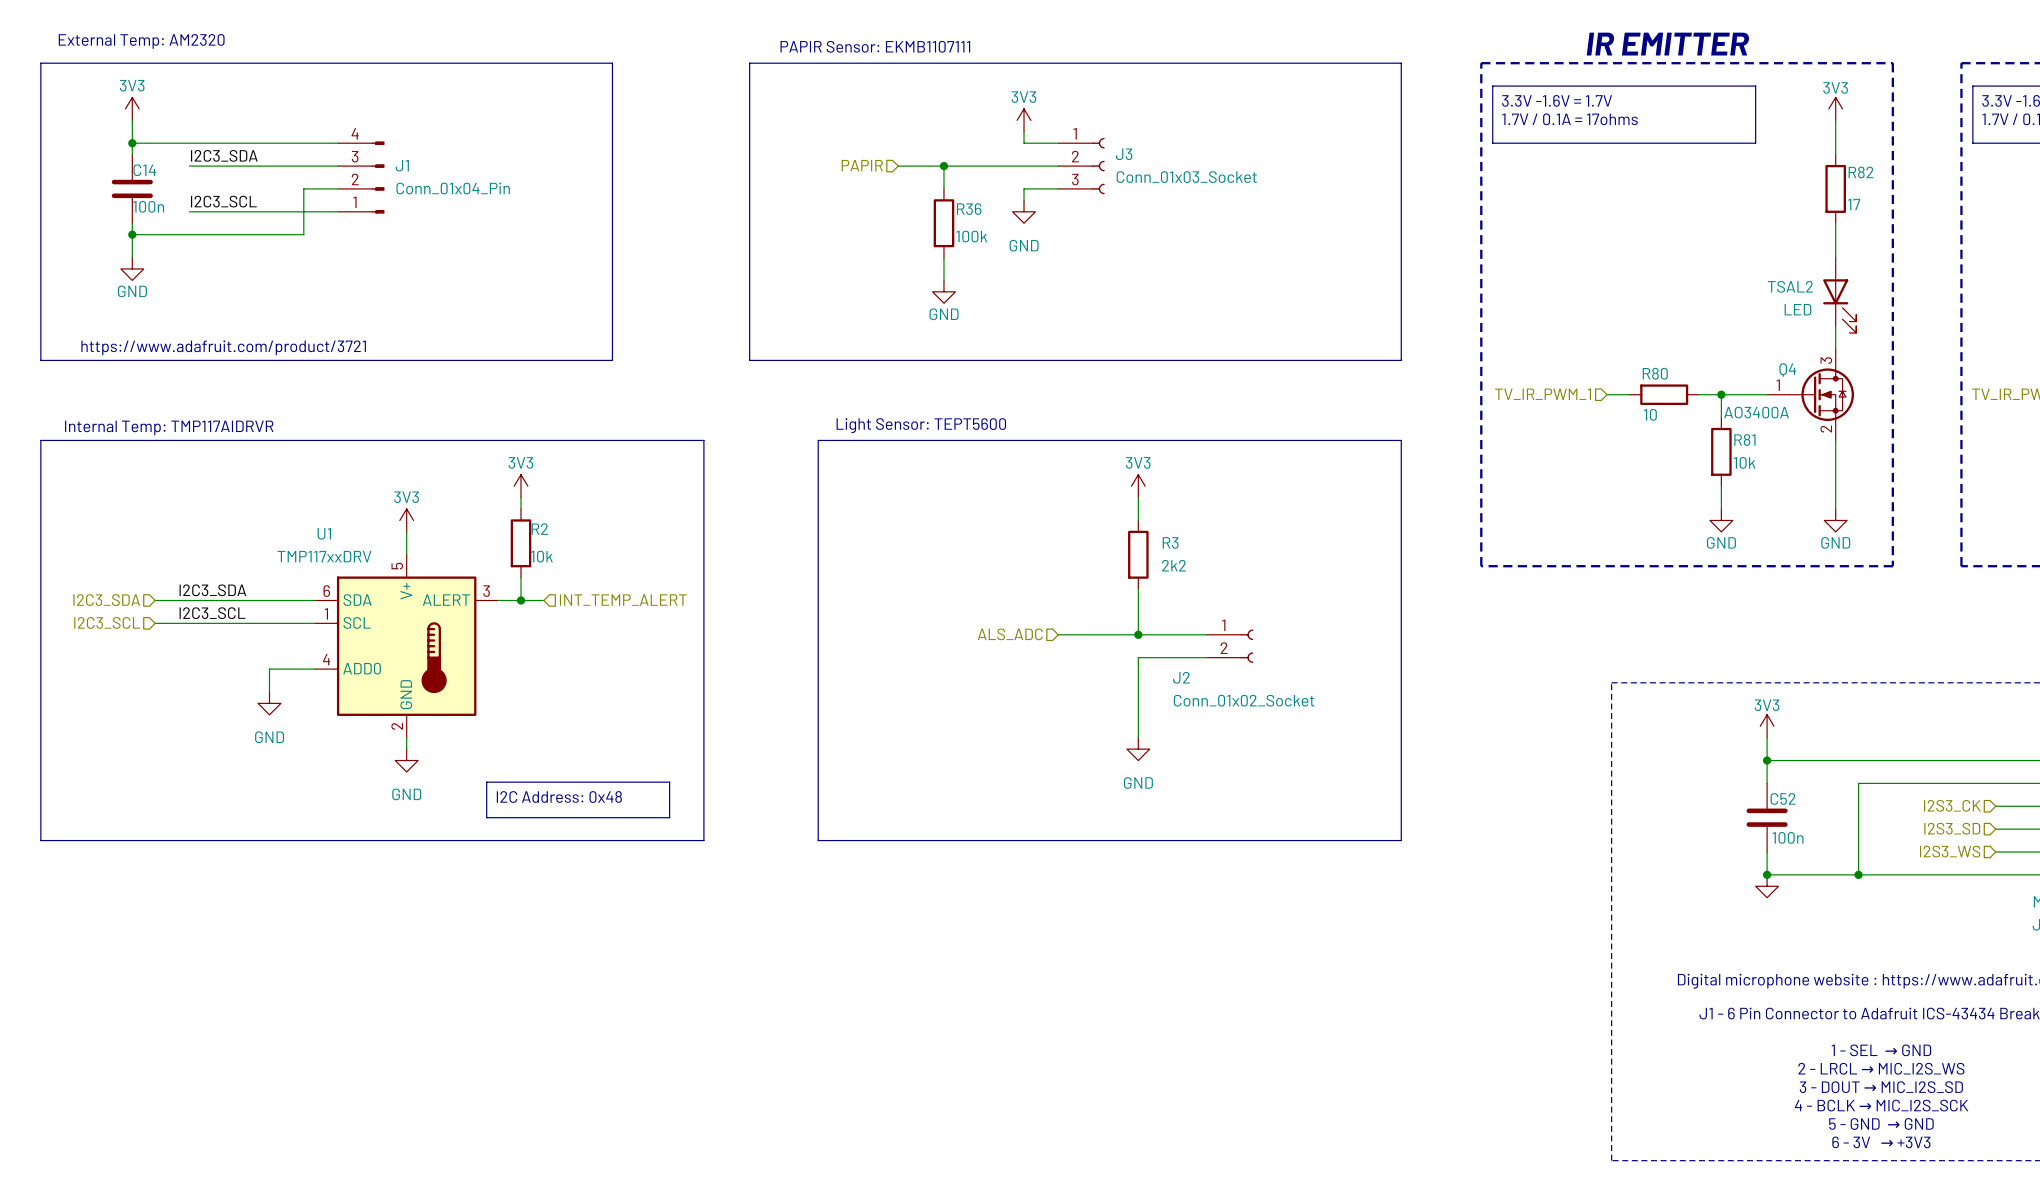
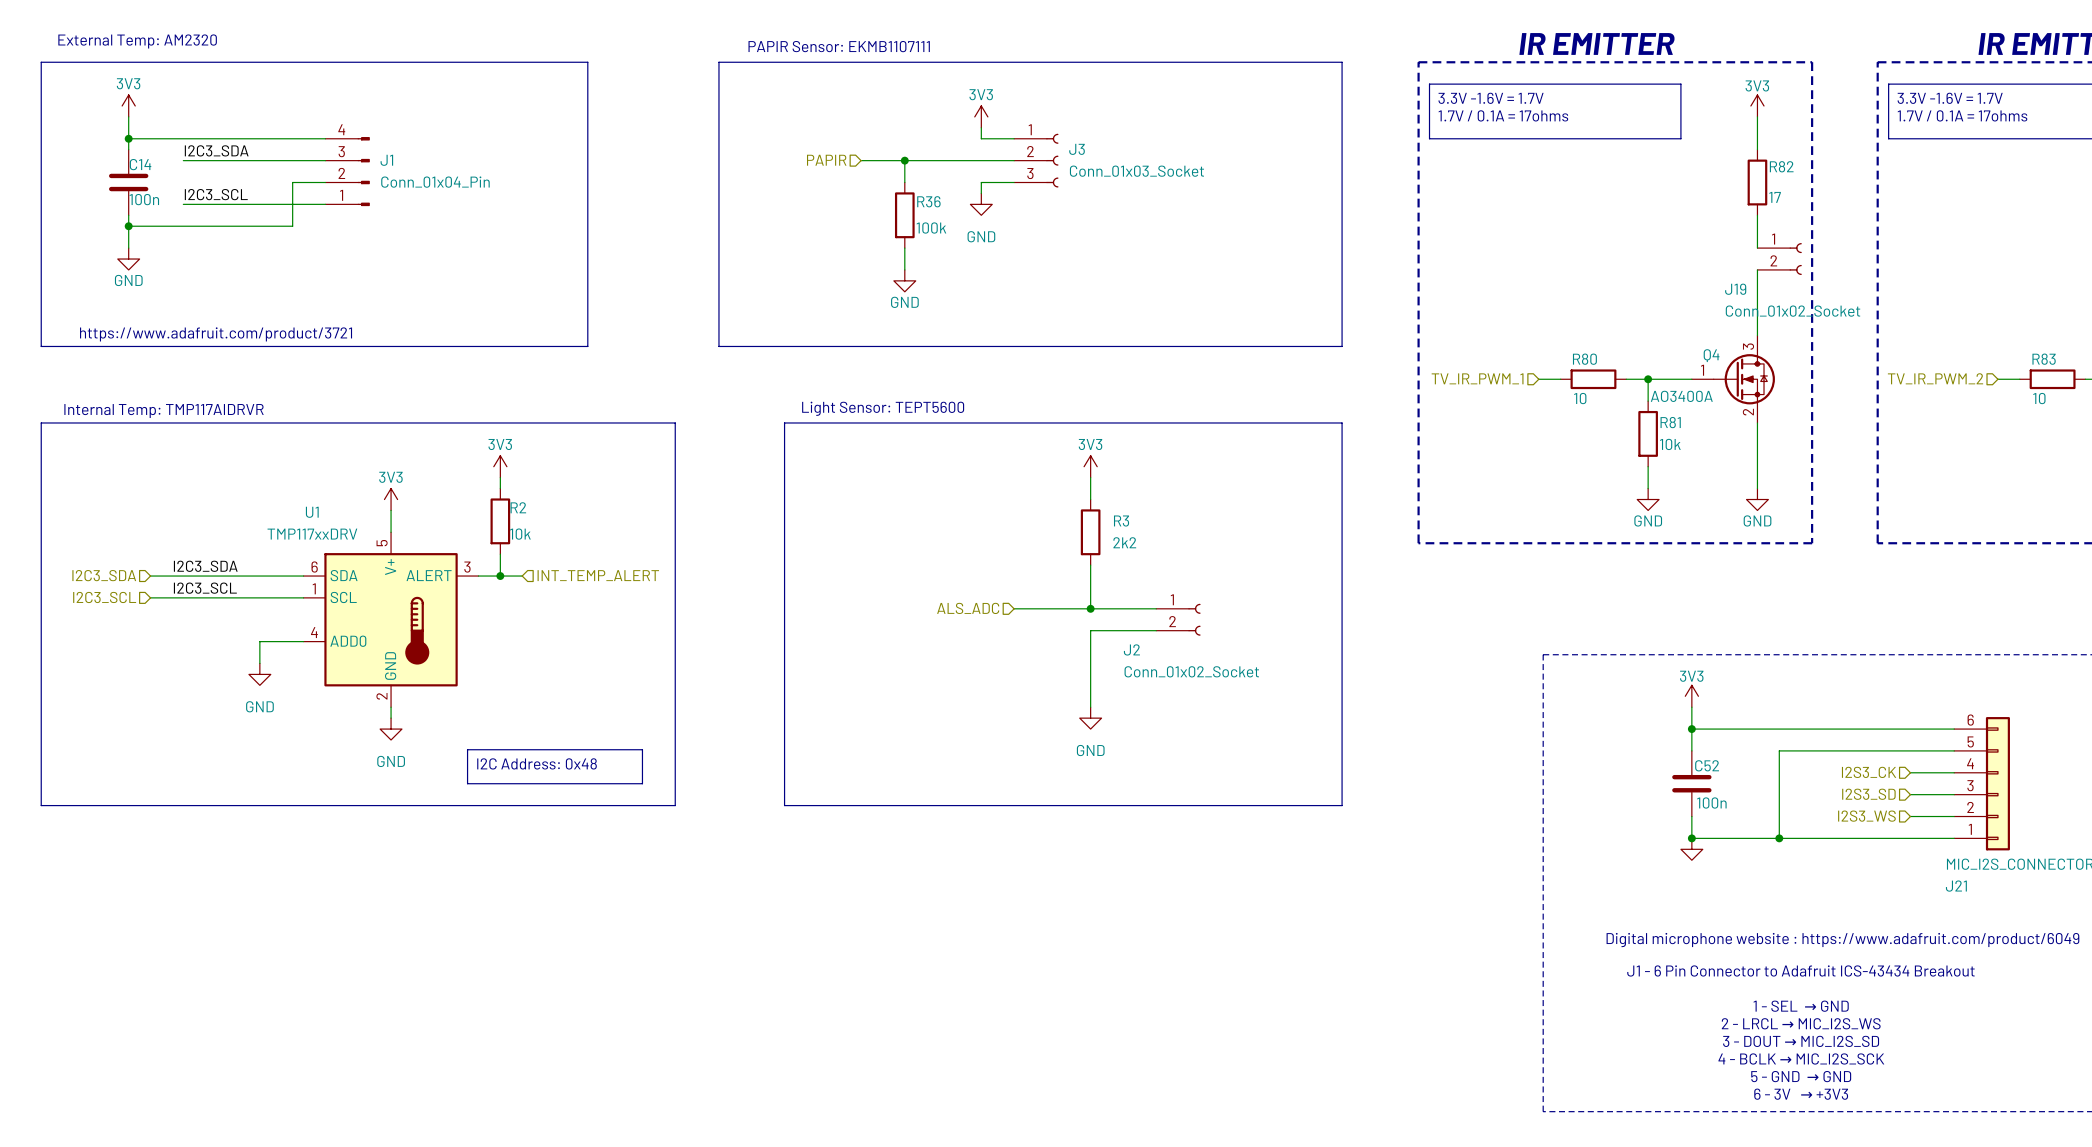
J19: none -> Conn_01x02_Socket (1779, 259)
TSAL2: LED (1839, 295) -> none

